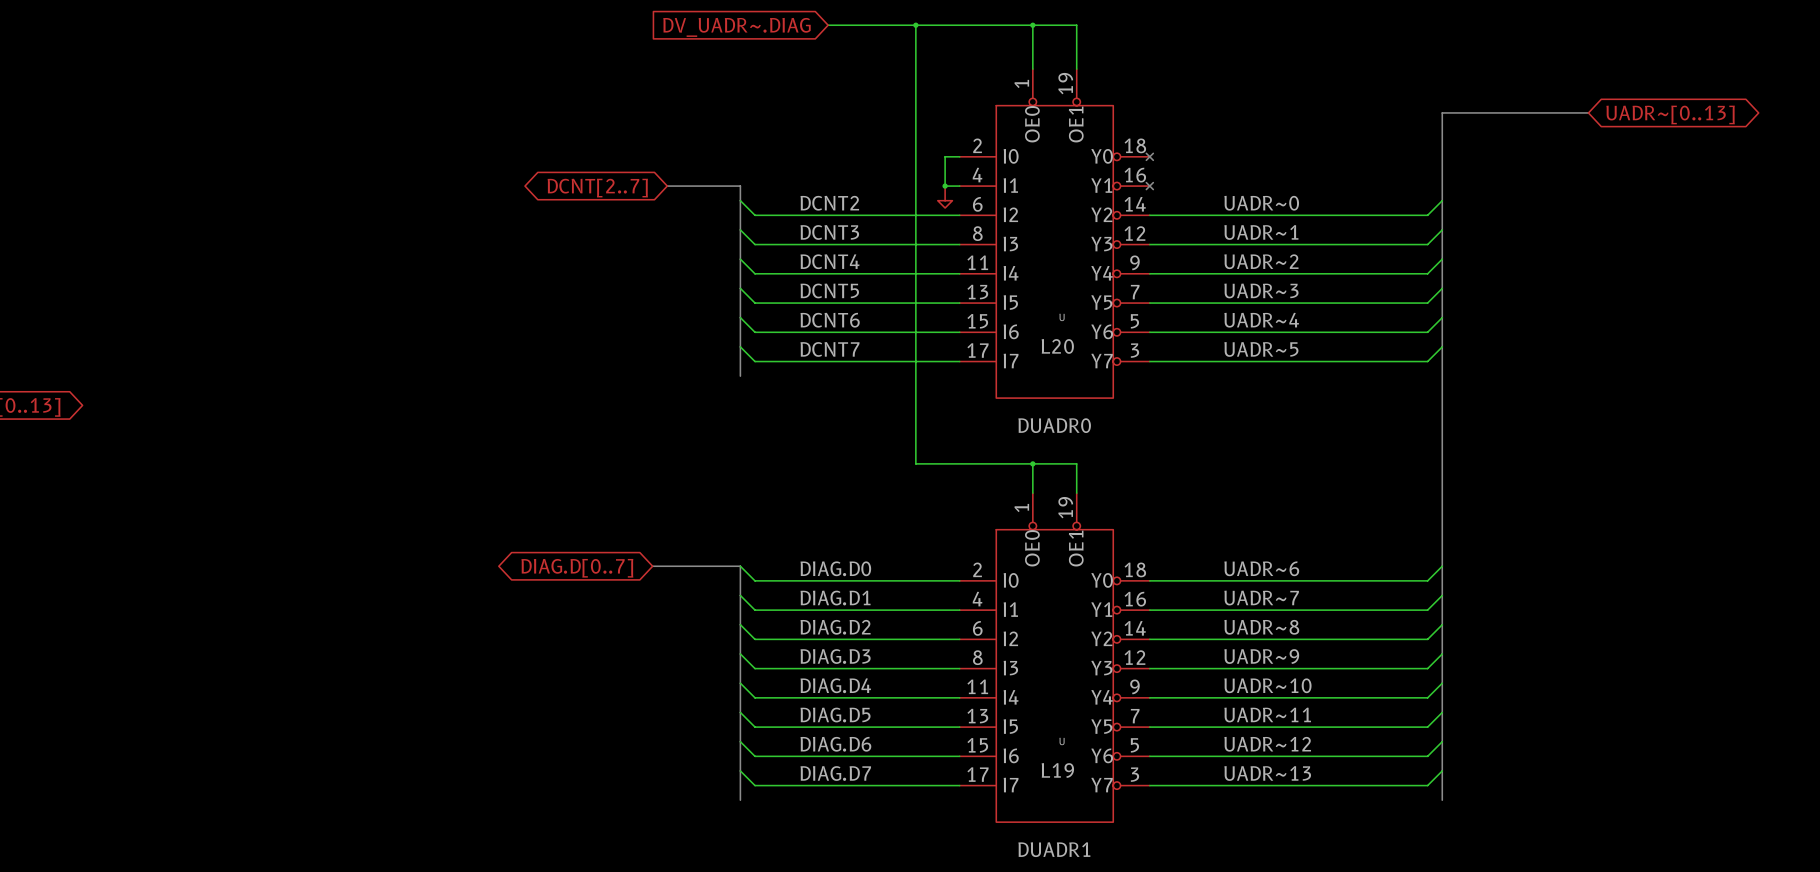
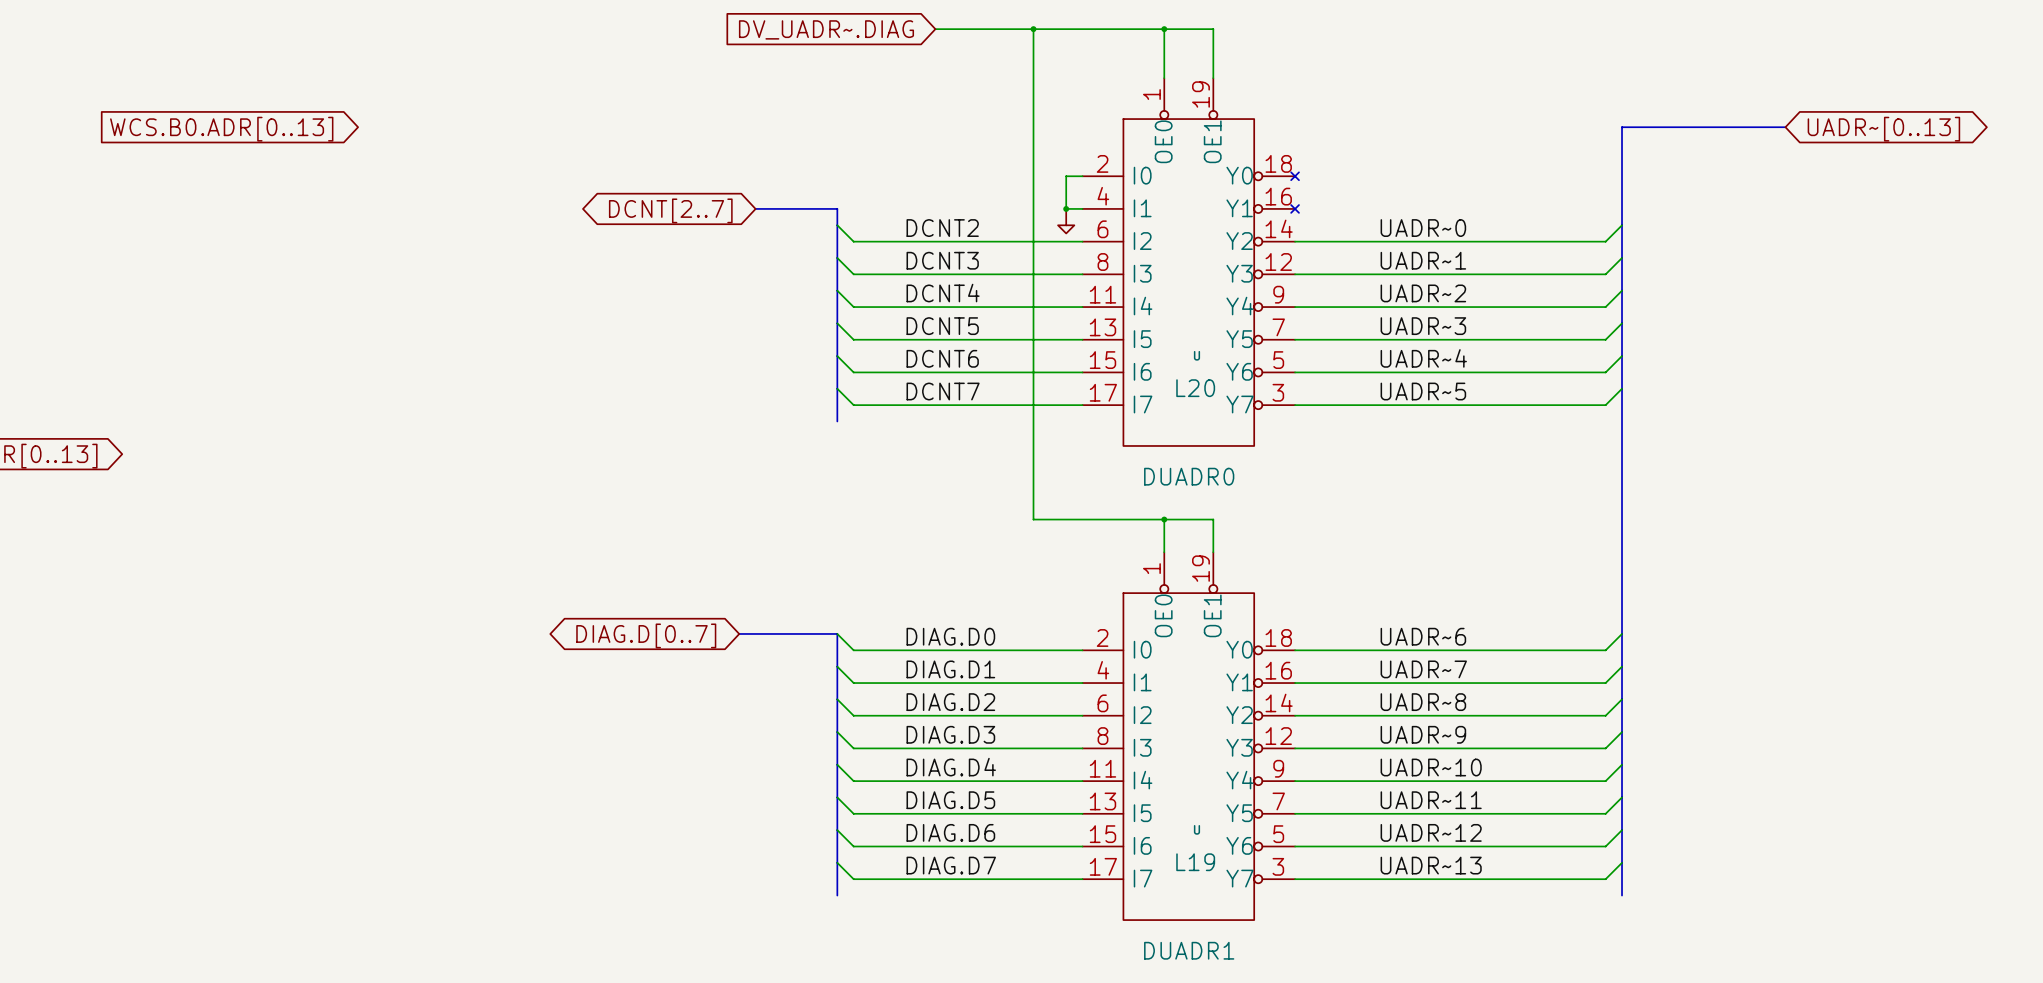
global label: none -> WCS.B0.ADR[0..13] (221, 129)

